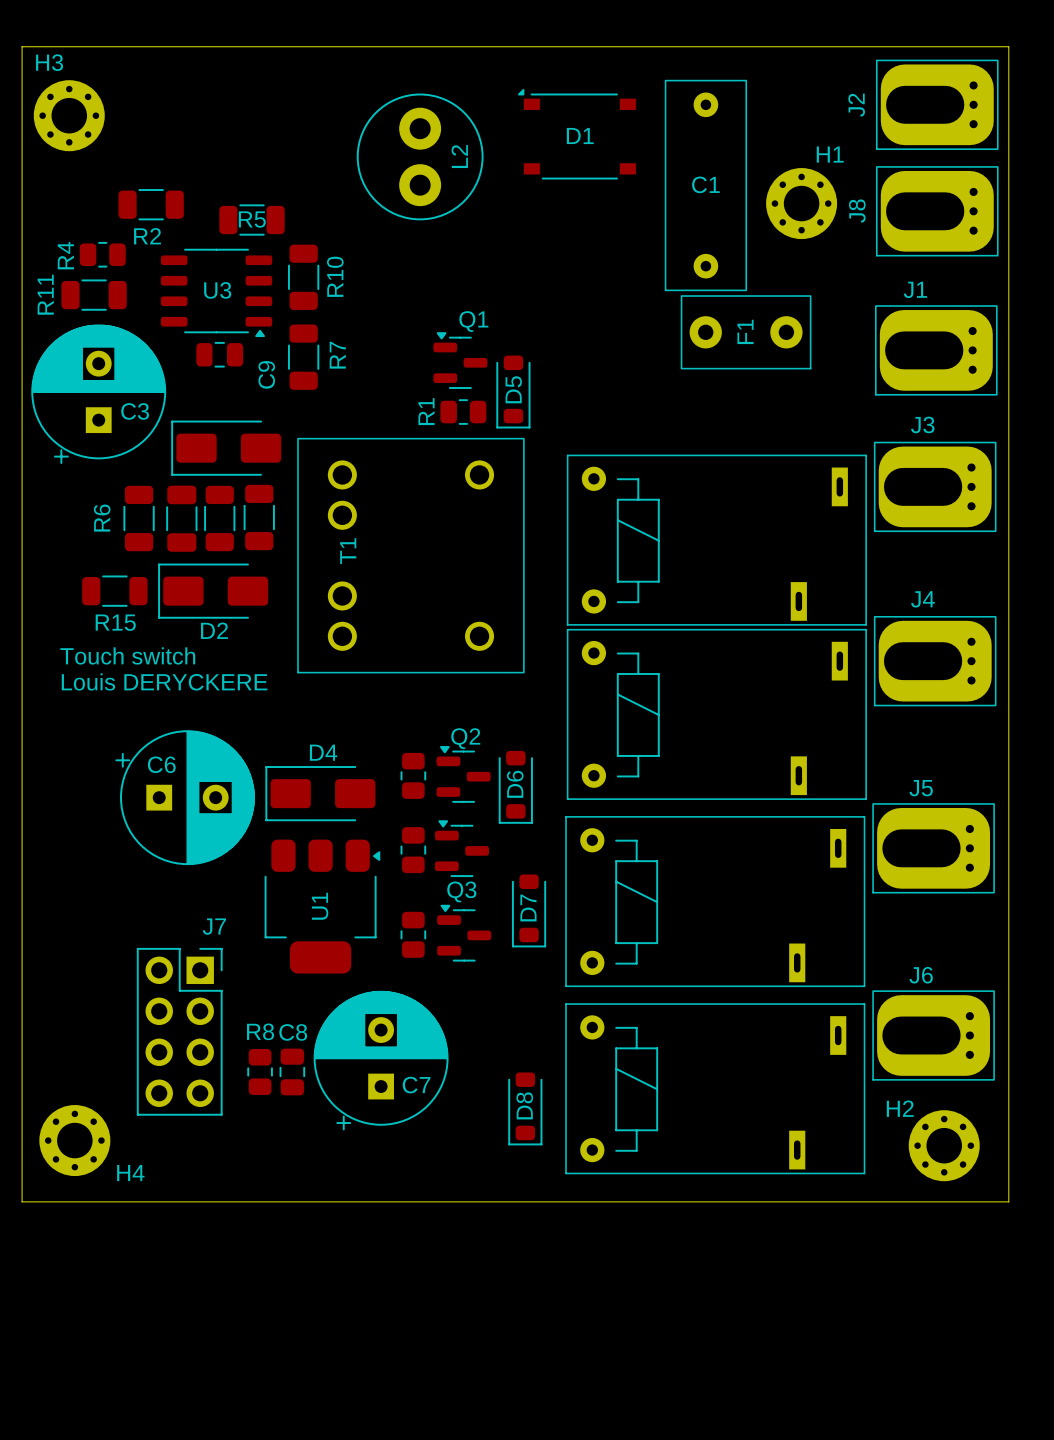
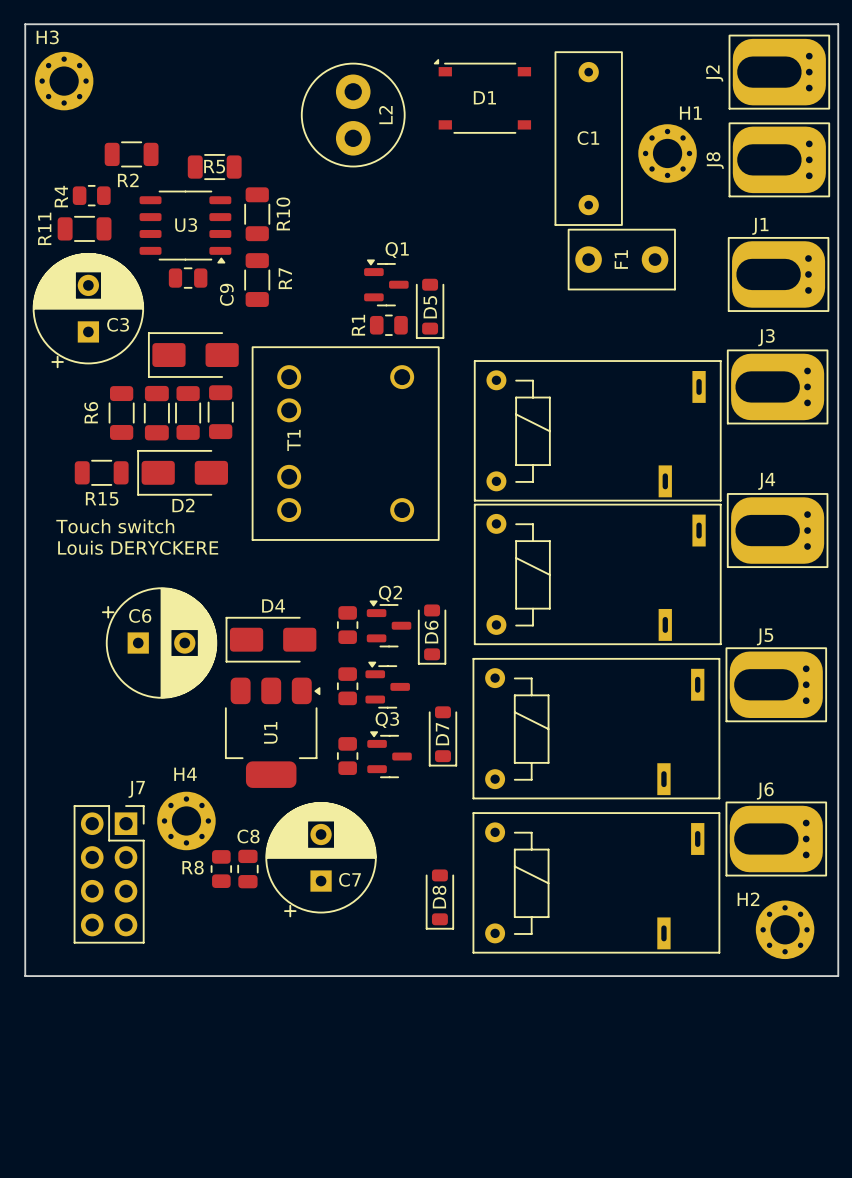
J7 position: (179, 1031) -> (109, 874)
R8 name position: R8 (260, 1031) -> R8 (193, 867)
H4 position: (74, 1140) -> (186, 820)
H4 name position: H4 (130, 1173) -> H4 (185, 774)

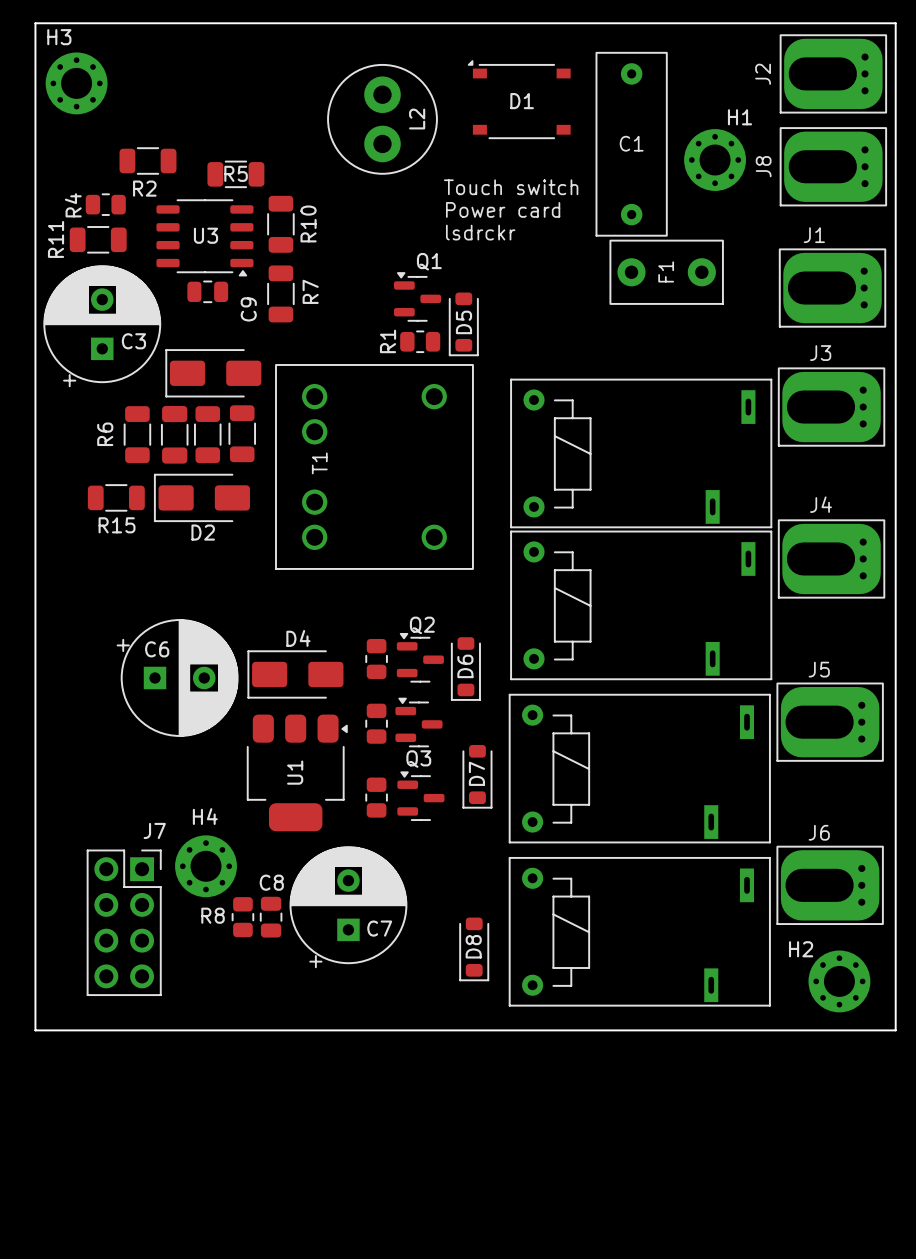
text: none -> Touch switch (511, 187)
text: none -> Power card (503, 209)
text: none -> lsdrckr (480, 232)
text: Touch switch (115, 526) -> none
text: Louis DERYCKERE (138, 547) -> none

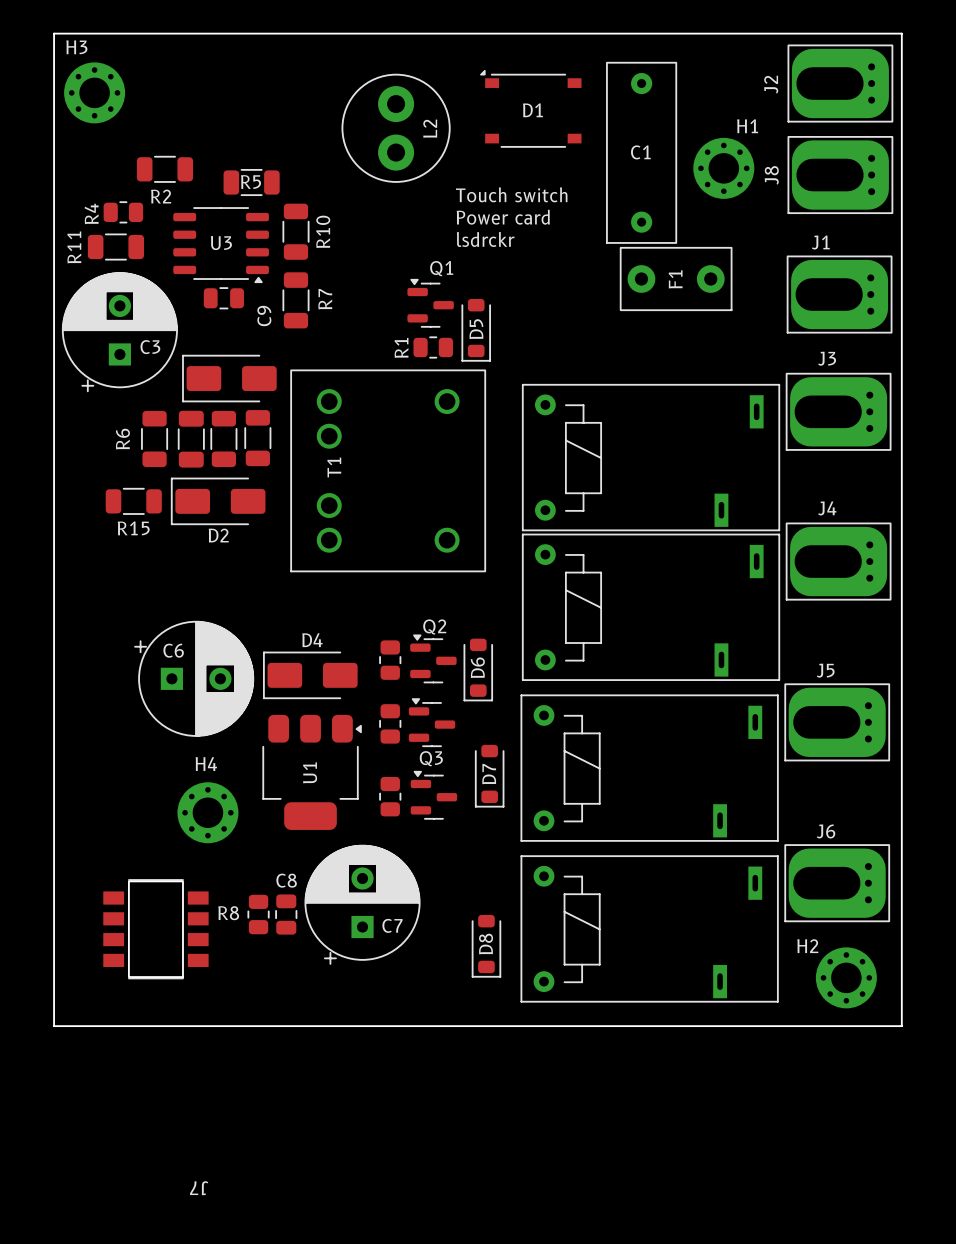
J7 name position: J7 (154, 830) -> J7 (199, 1188)
J7 footprint: [86, 849, 162, 996] -> [103, 879, 209, 980]
H4 position: (206, 866) -> (207, 812)

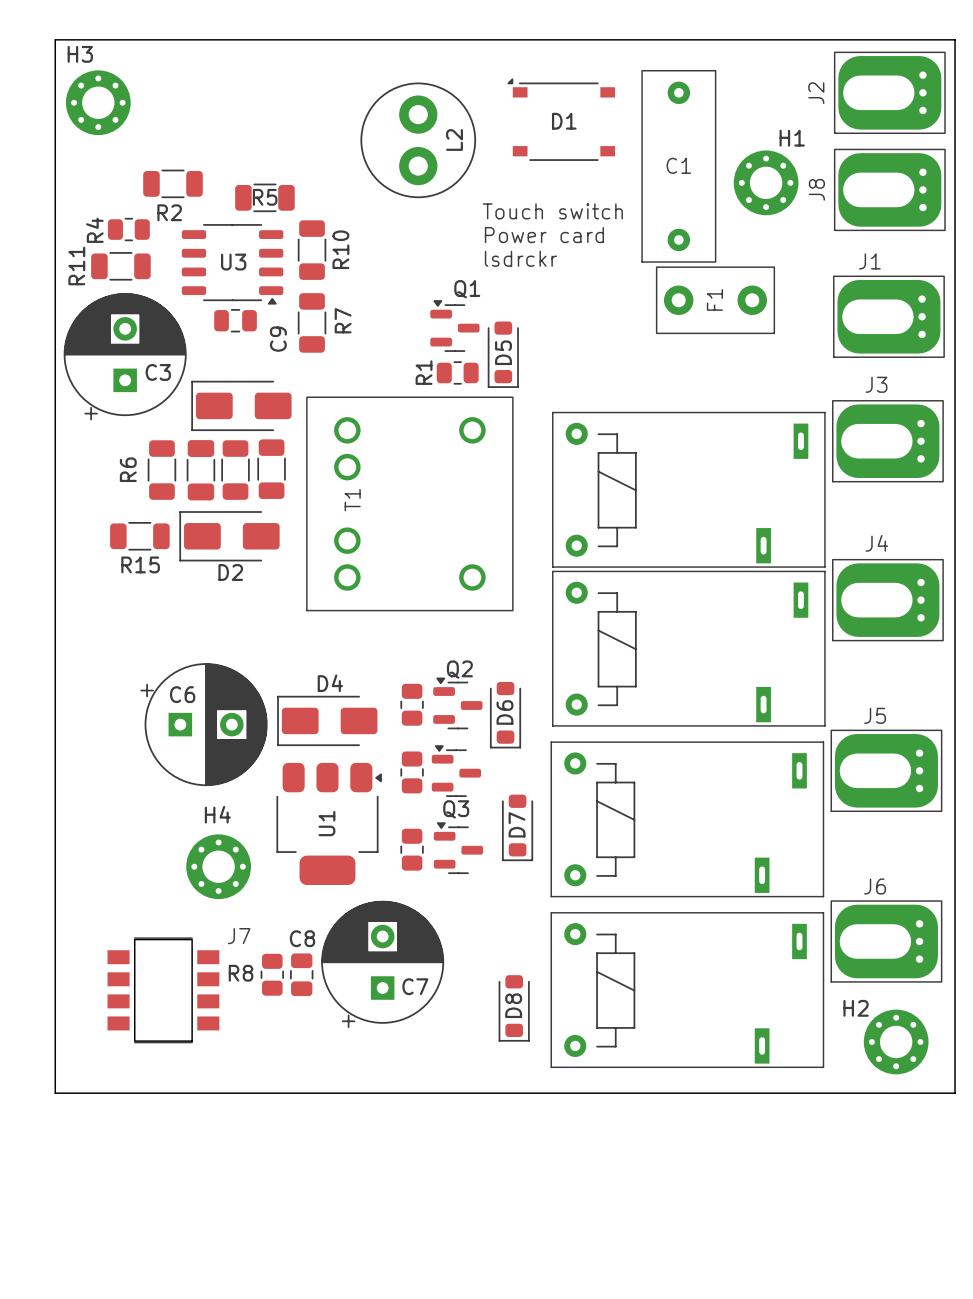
J7 name rotation: 0° (199, 1188) -> 180° (239, 936)
J7 name position: J7 (199, 1188) -> J7 (239, 936)

